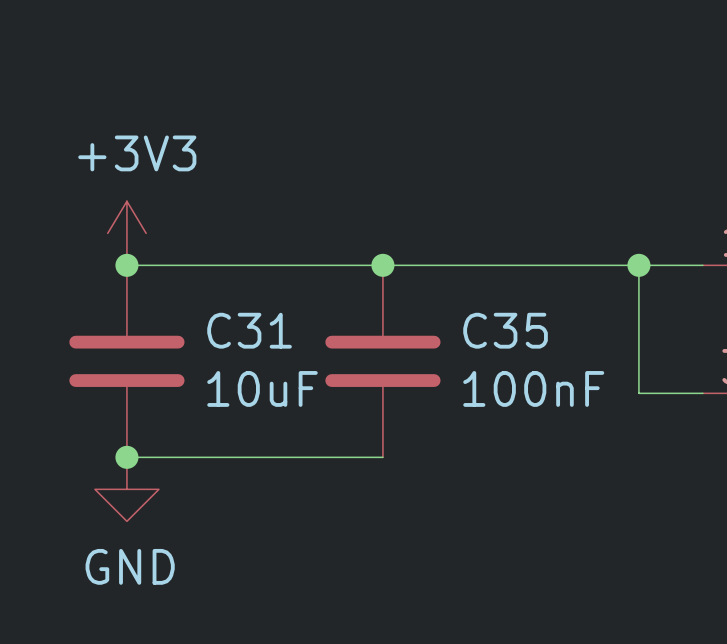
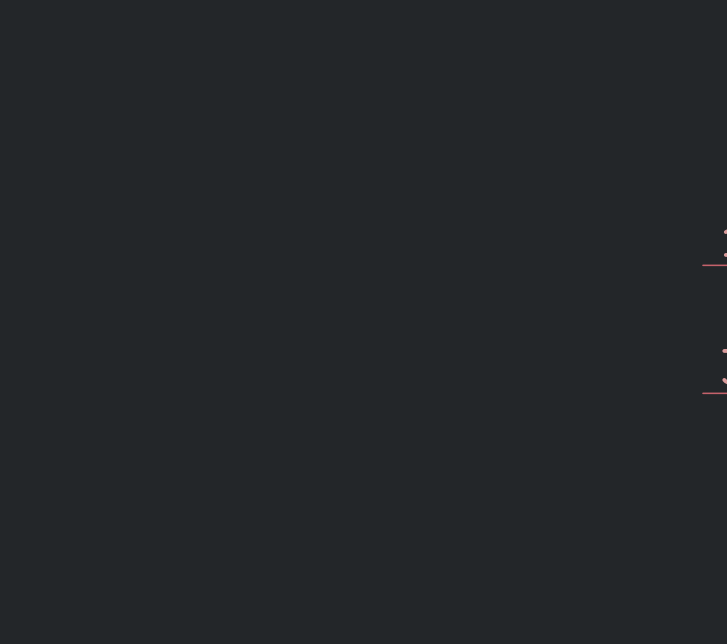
power symbol: +3V3 (126, 233) -> none
wire: (126, 265) (702, 265) -> none
junction: (126, 265) -> none
junction: (382, 265) -> none
wire: (638, 265) (638, 393) (702, 393) -> none
junction: (638, 265) -> none
C31: 10uF (126, 361) -> none
C35: 100nF (382, 361) -> none
wire: (126, 457) (382, 457) -> none
junction: (126, 457) -> none
power symbol: GND (126, 489) -> none

